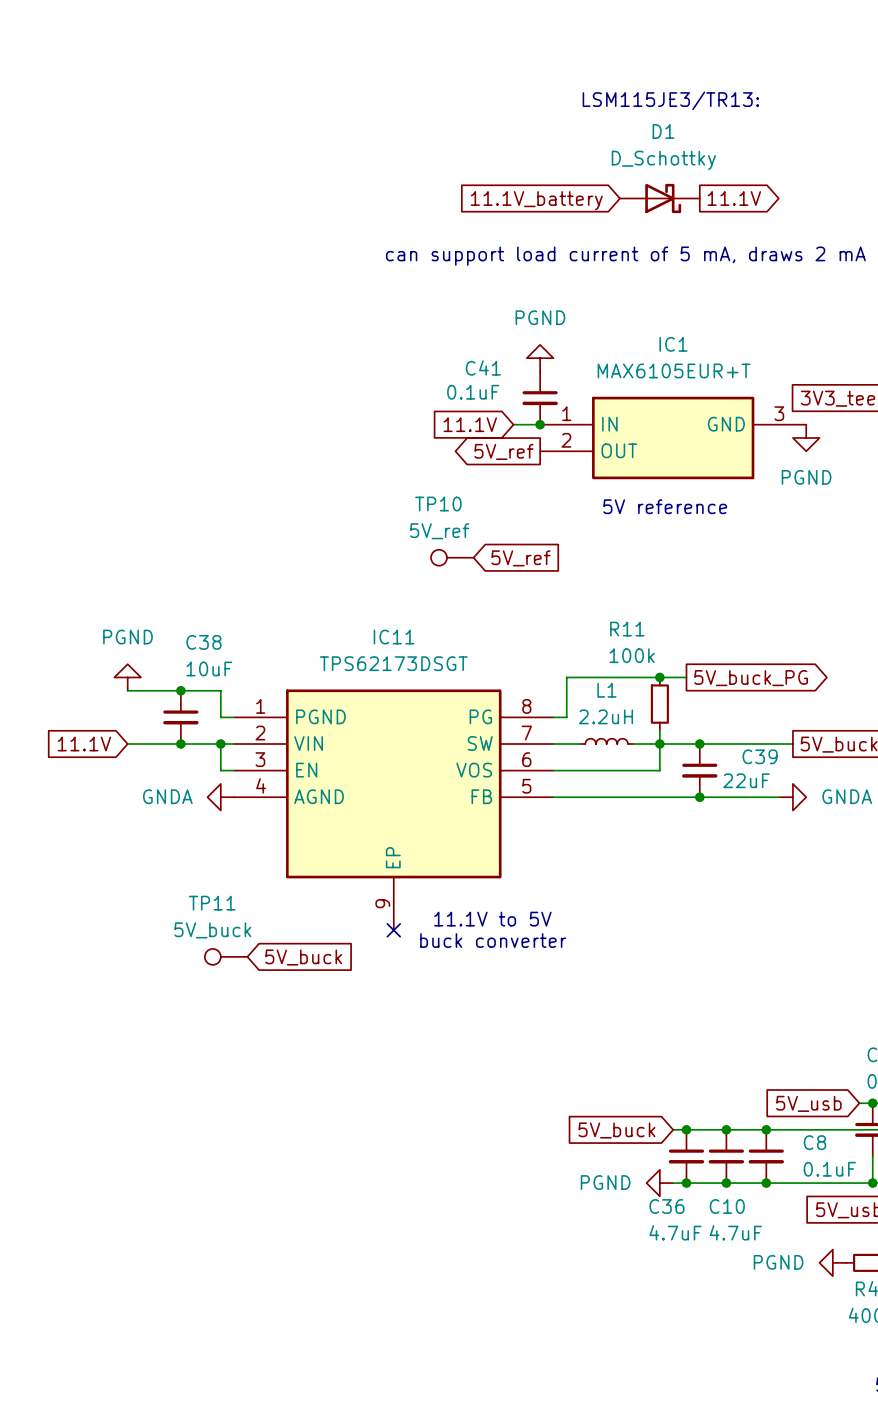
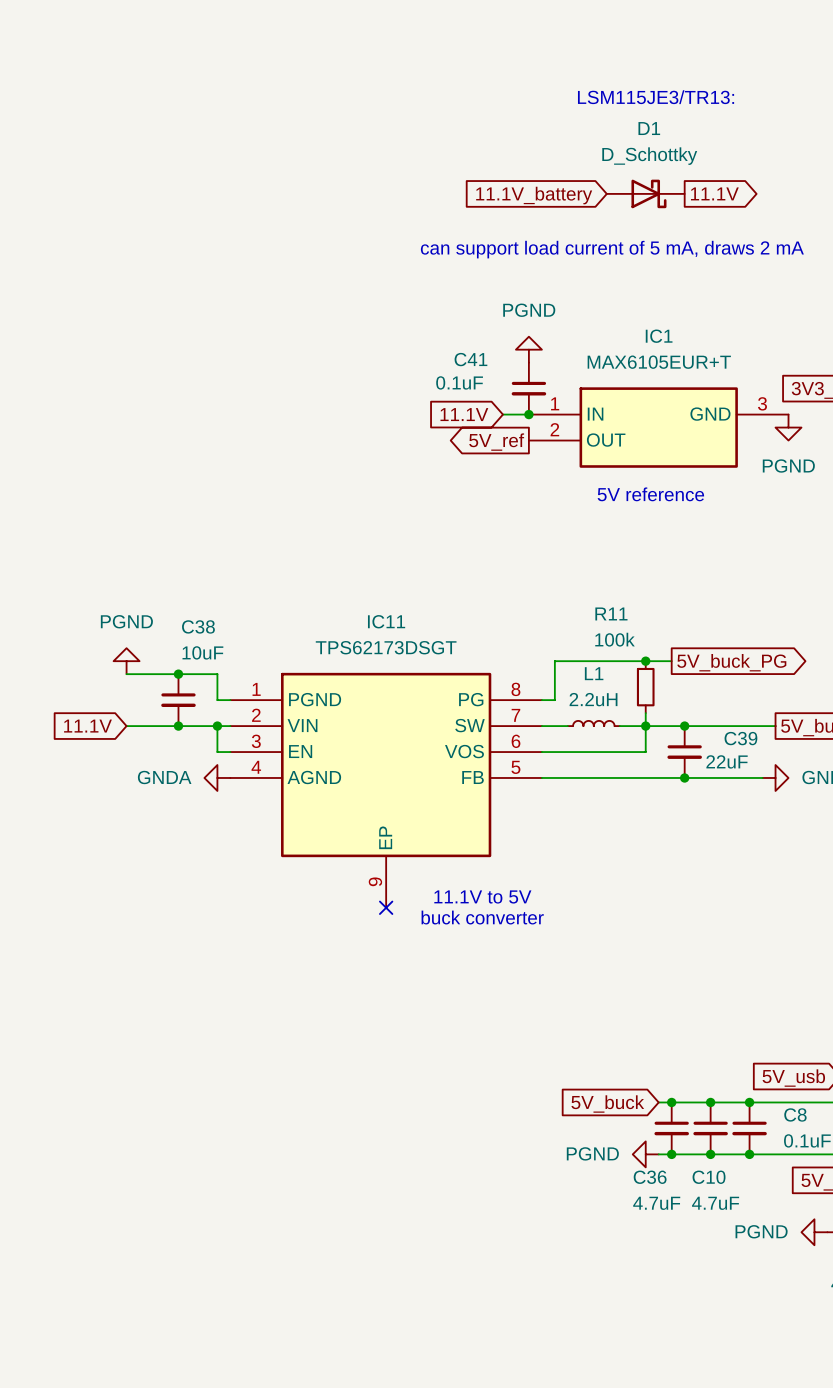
TP10: 5V_ref (452, 557) -> none
global label: 5V_ref (520, 558) -> none
TP11: 5V_buck (226, 956) -> none
global label: 5V_buck (303, 957) -> none

